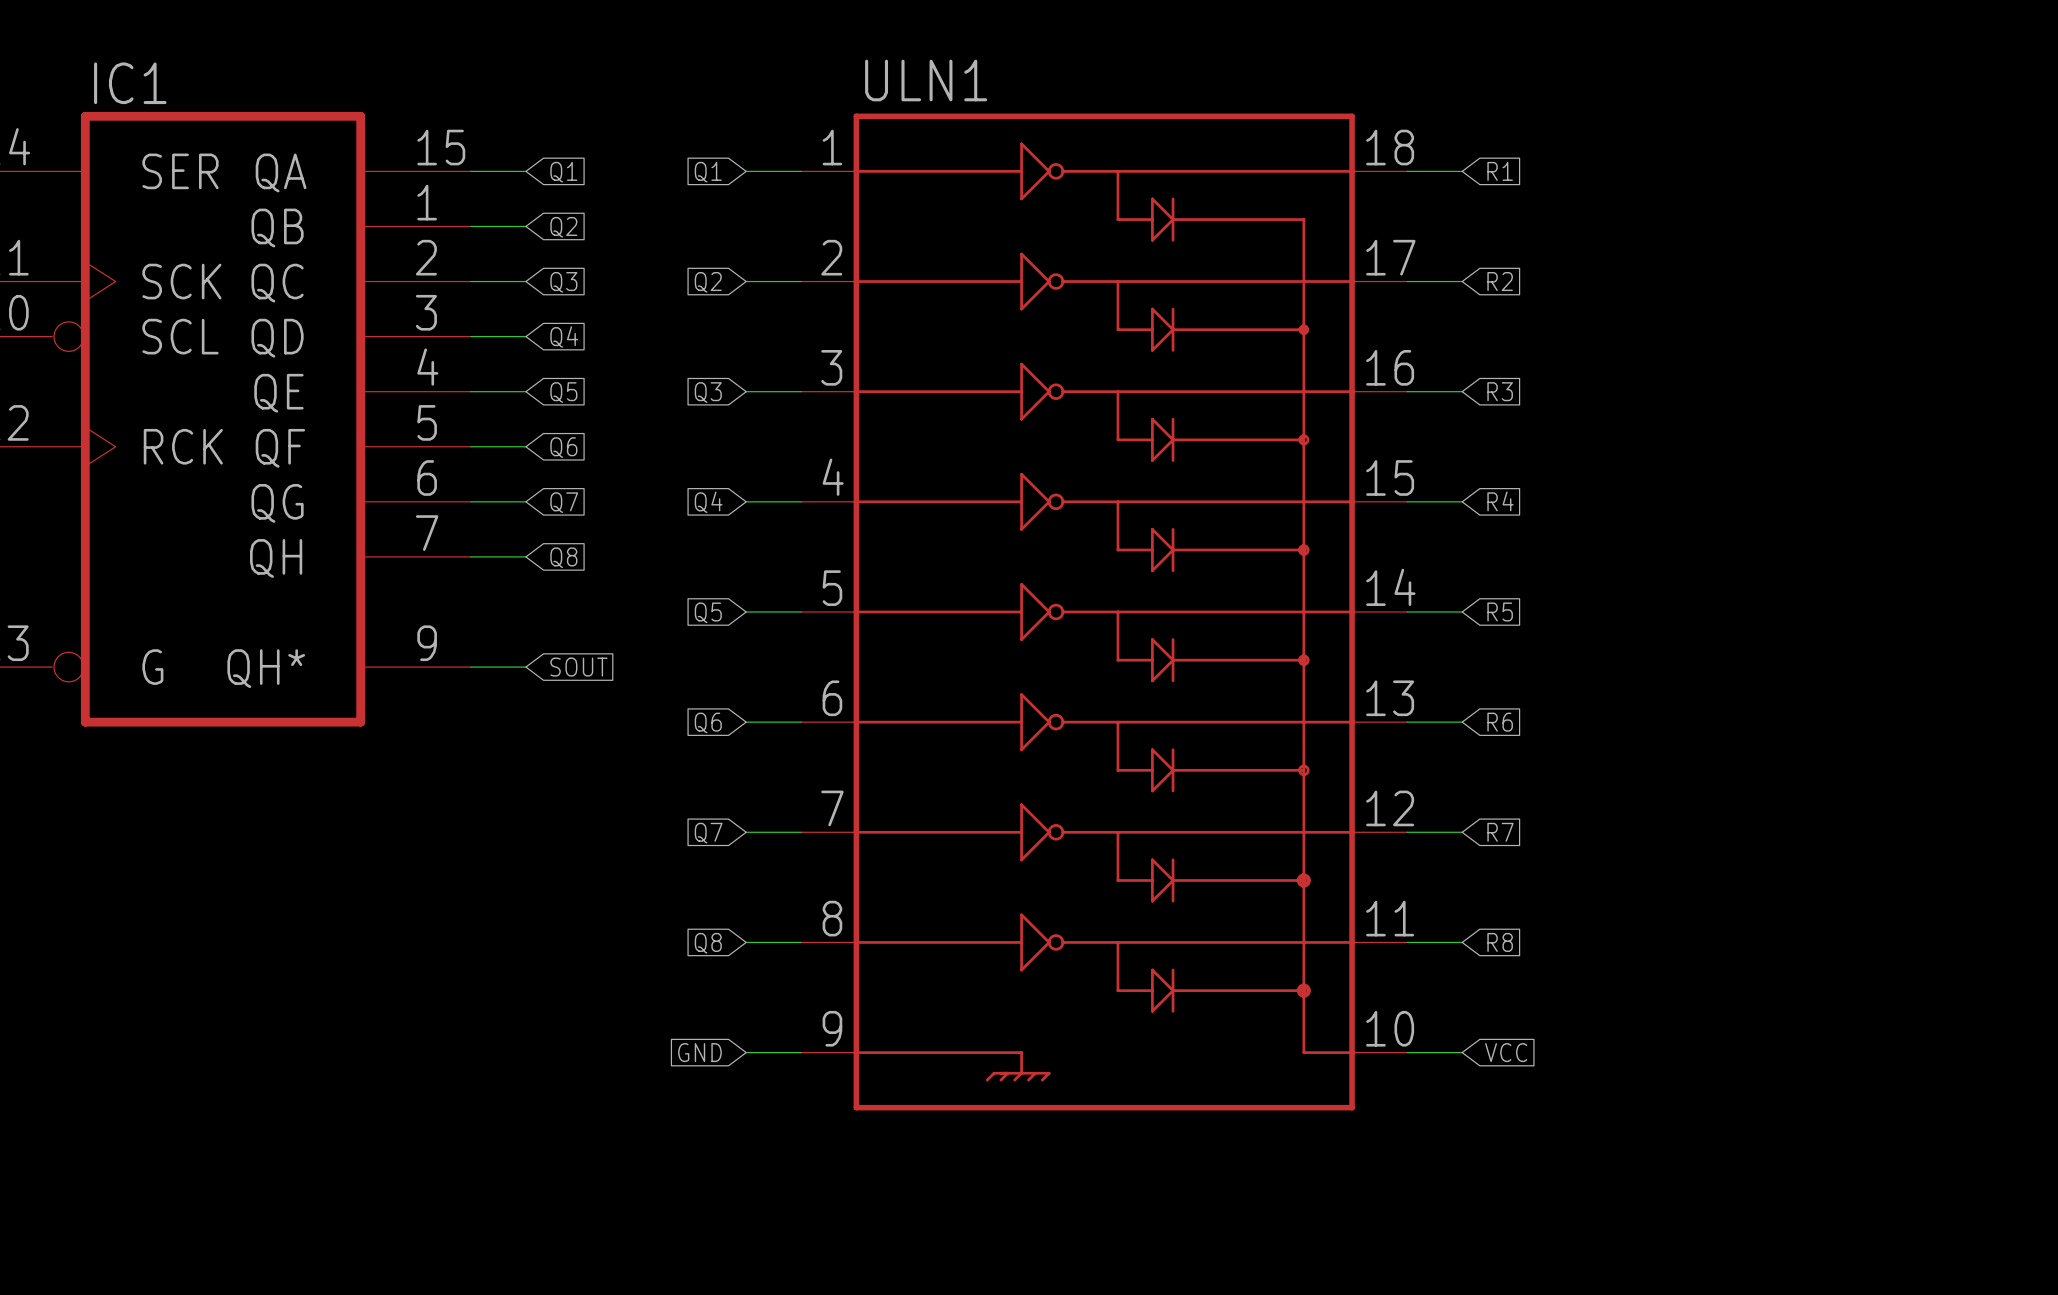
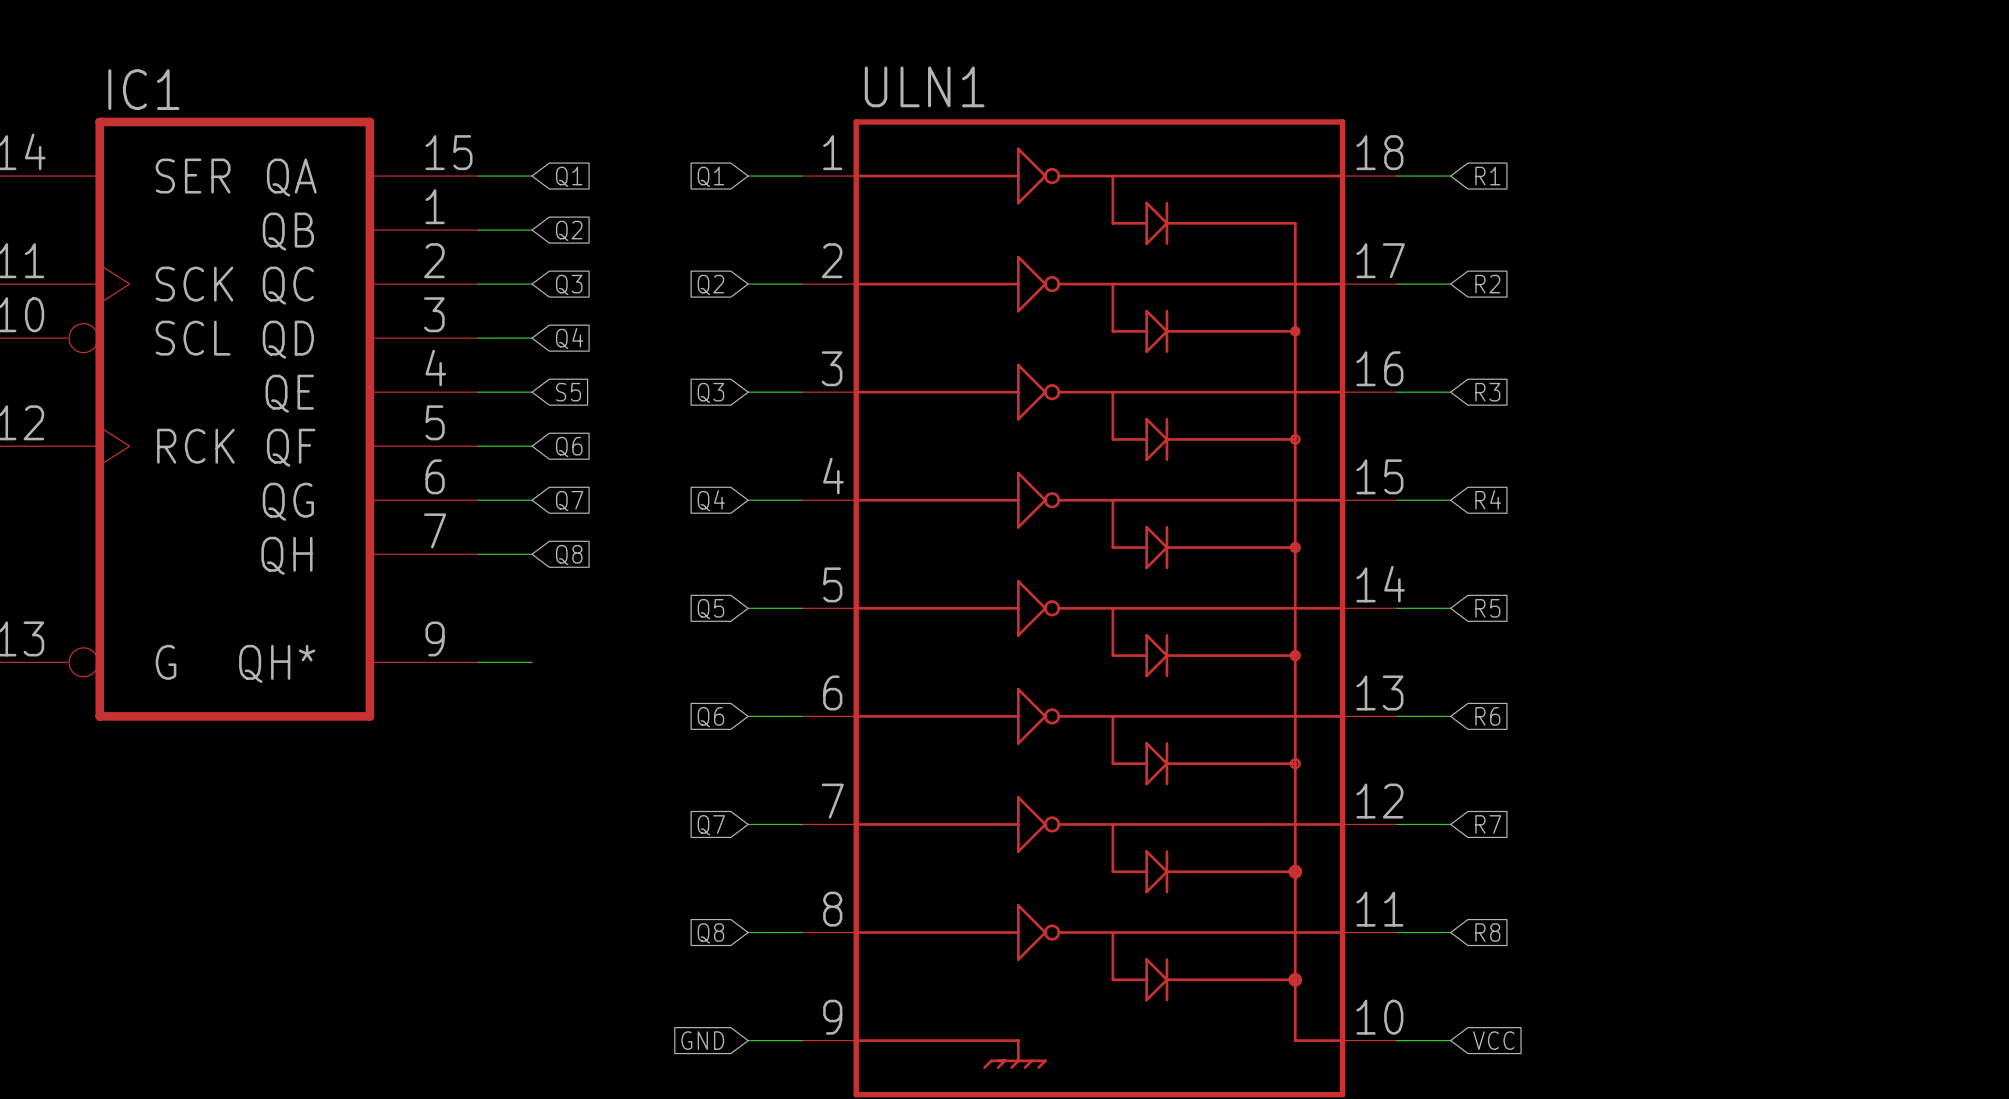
global label: Q5 (563, 392) -> S5 (568, 392)
global label: SOUT (578, 667) -> none

